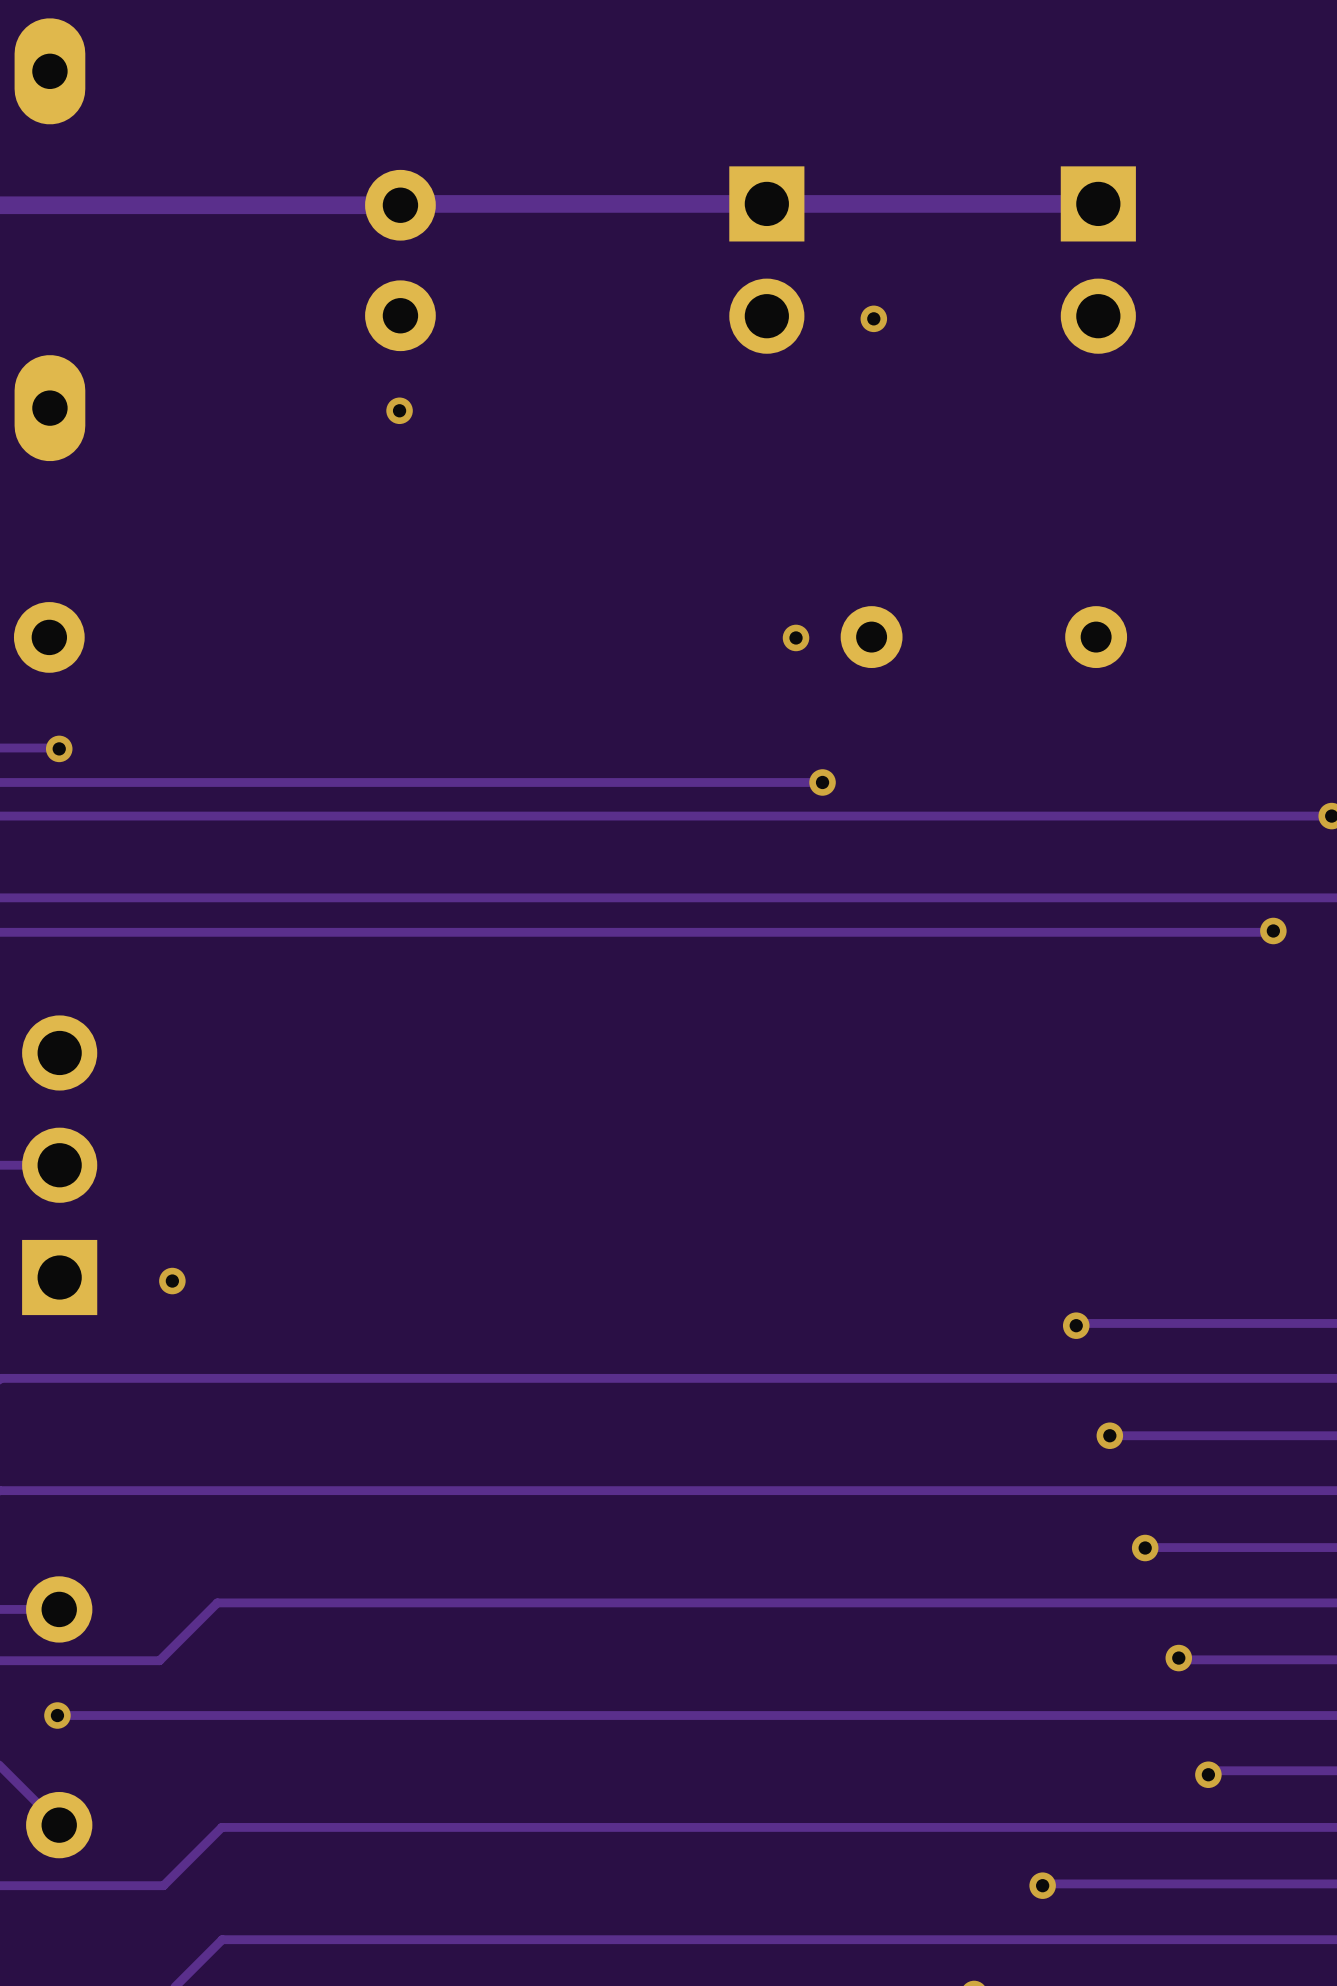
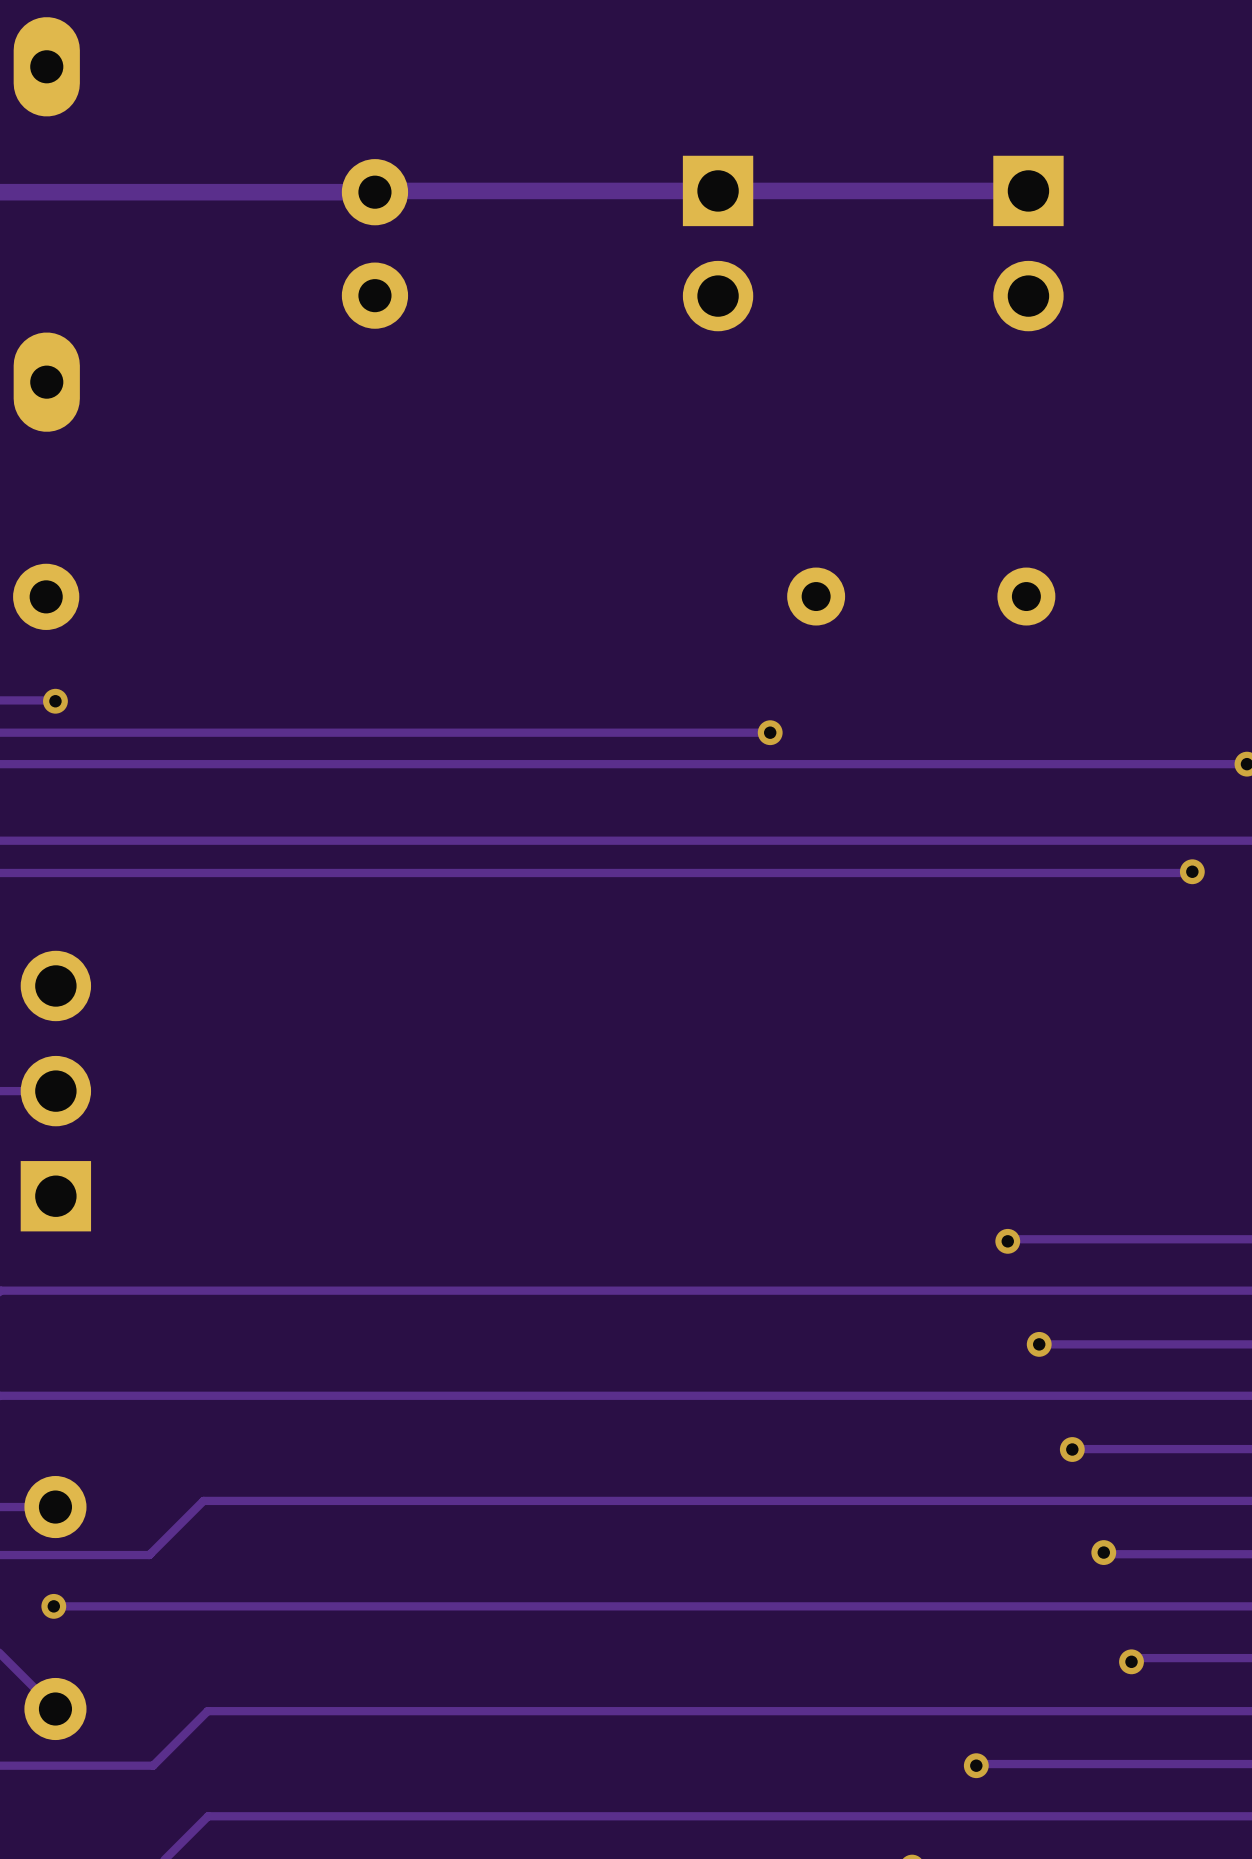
via: (873, 318) -> none
via: (399, 410) -> none
via: (796, 637) -> none
via: (172, 1281) -> none

